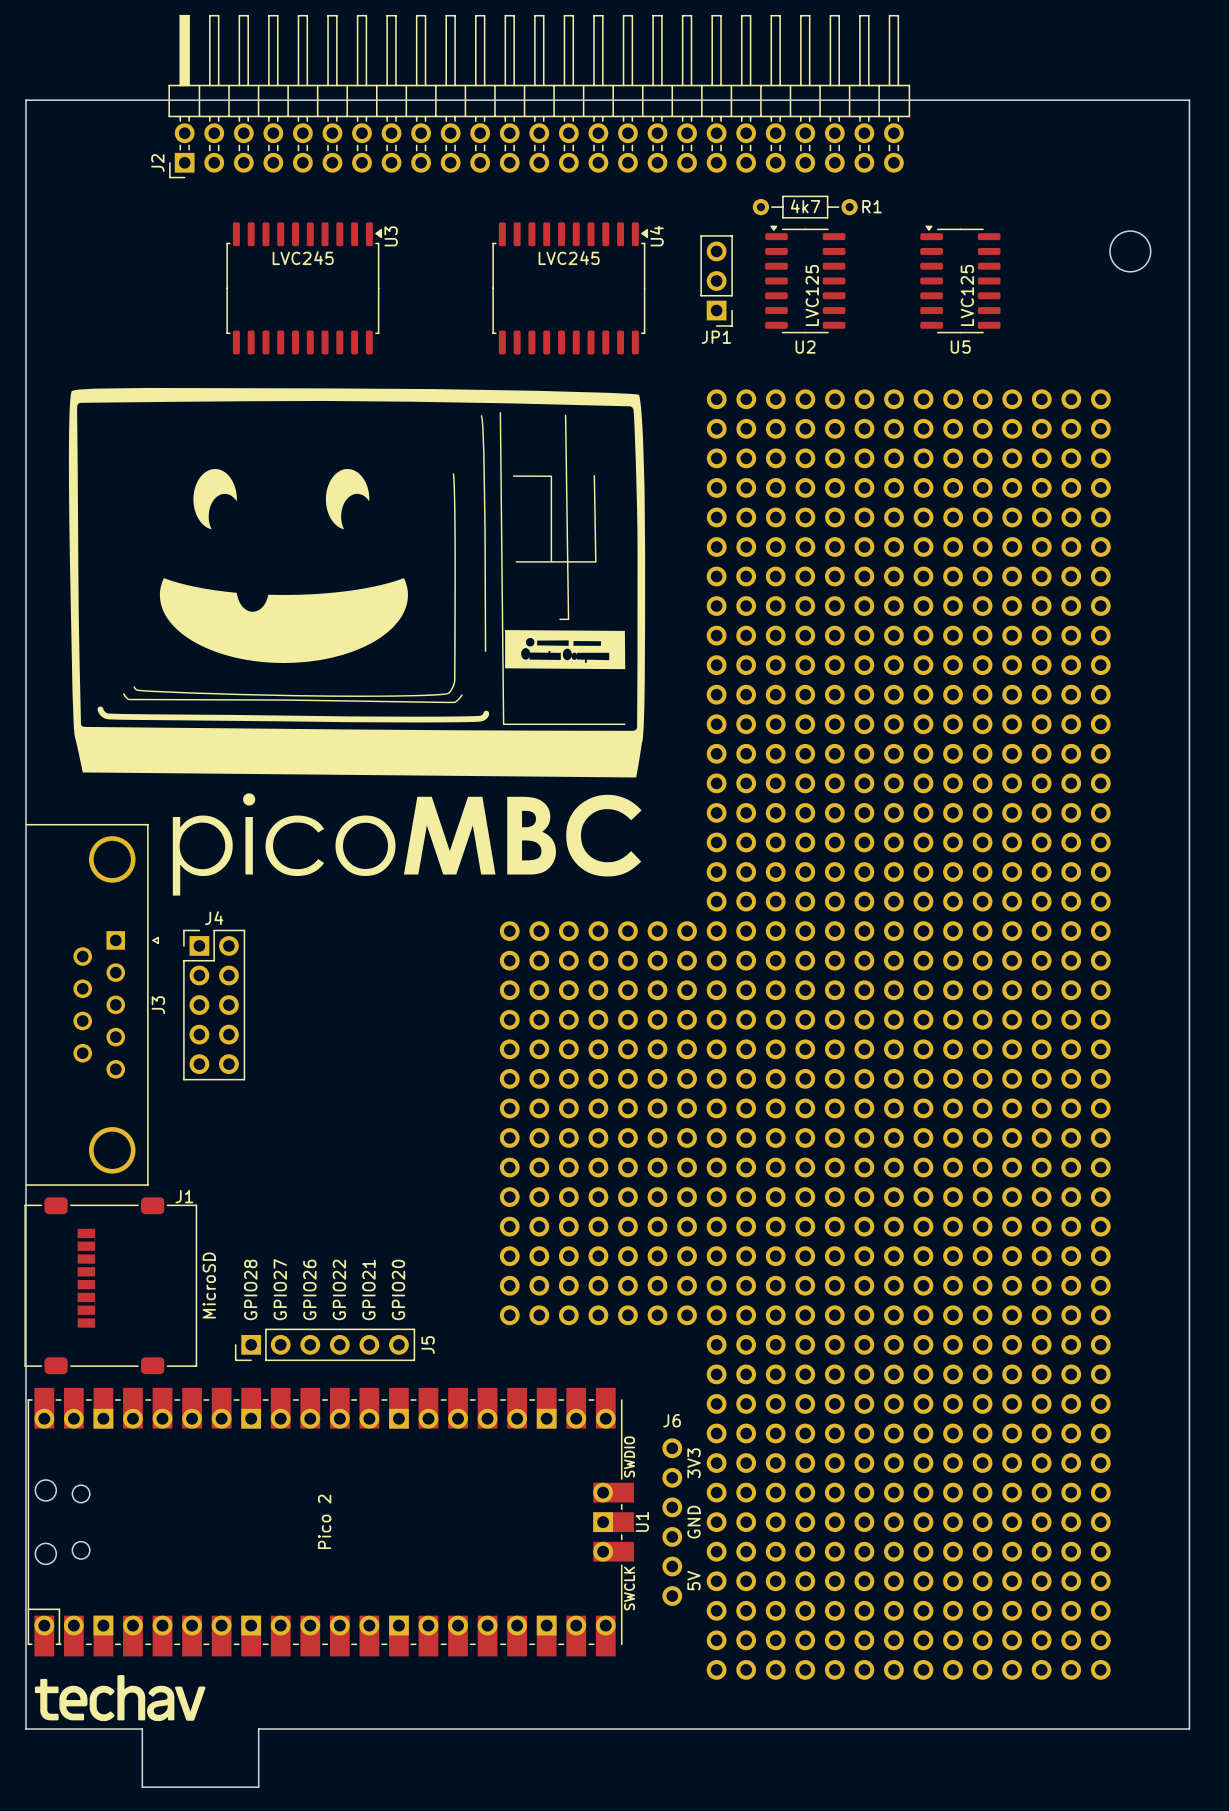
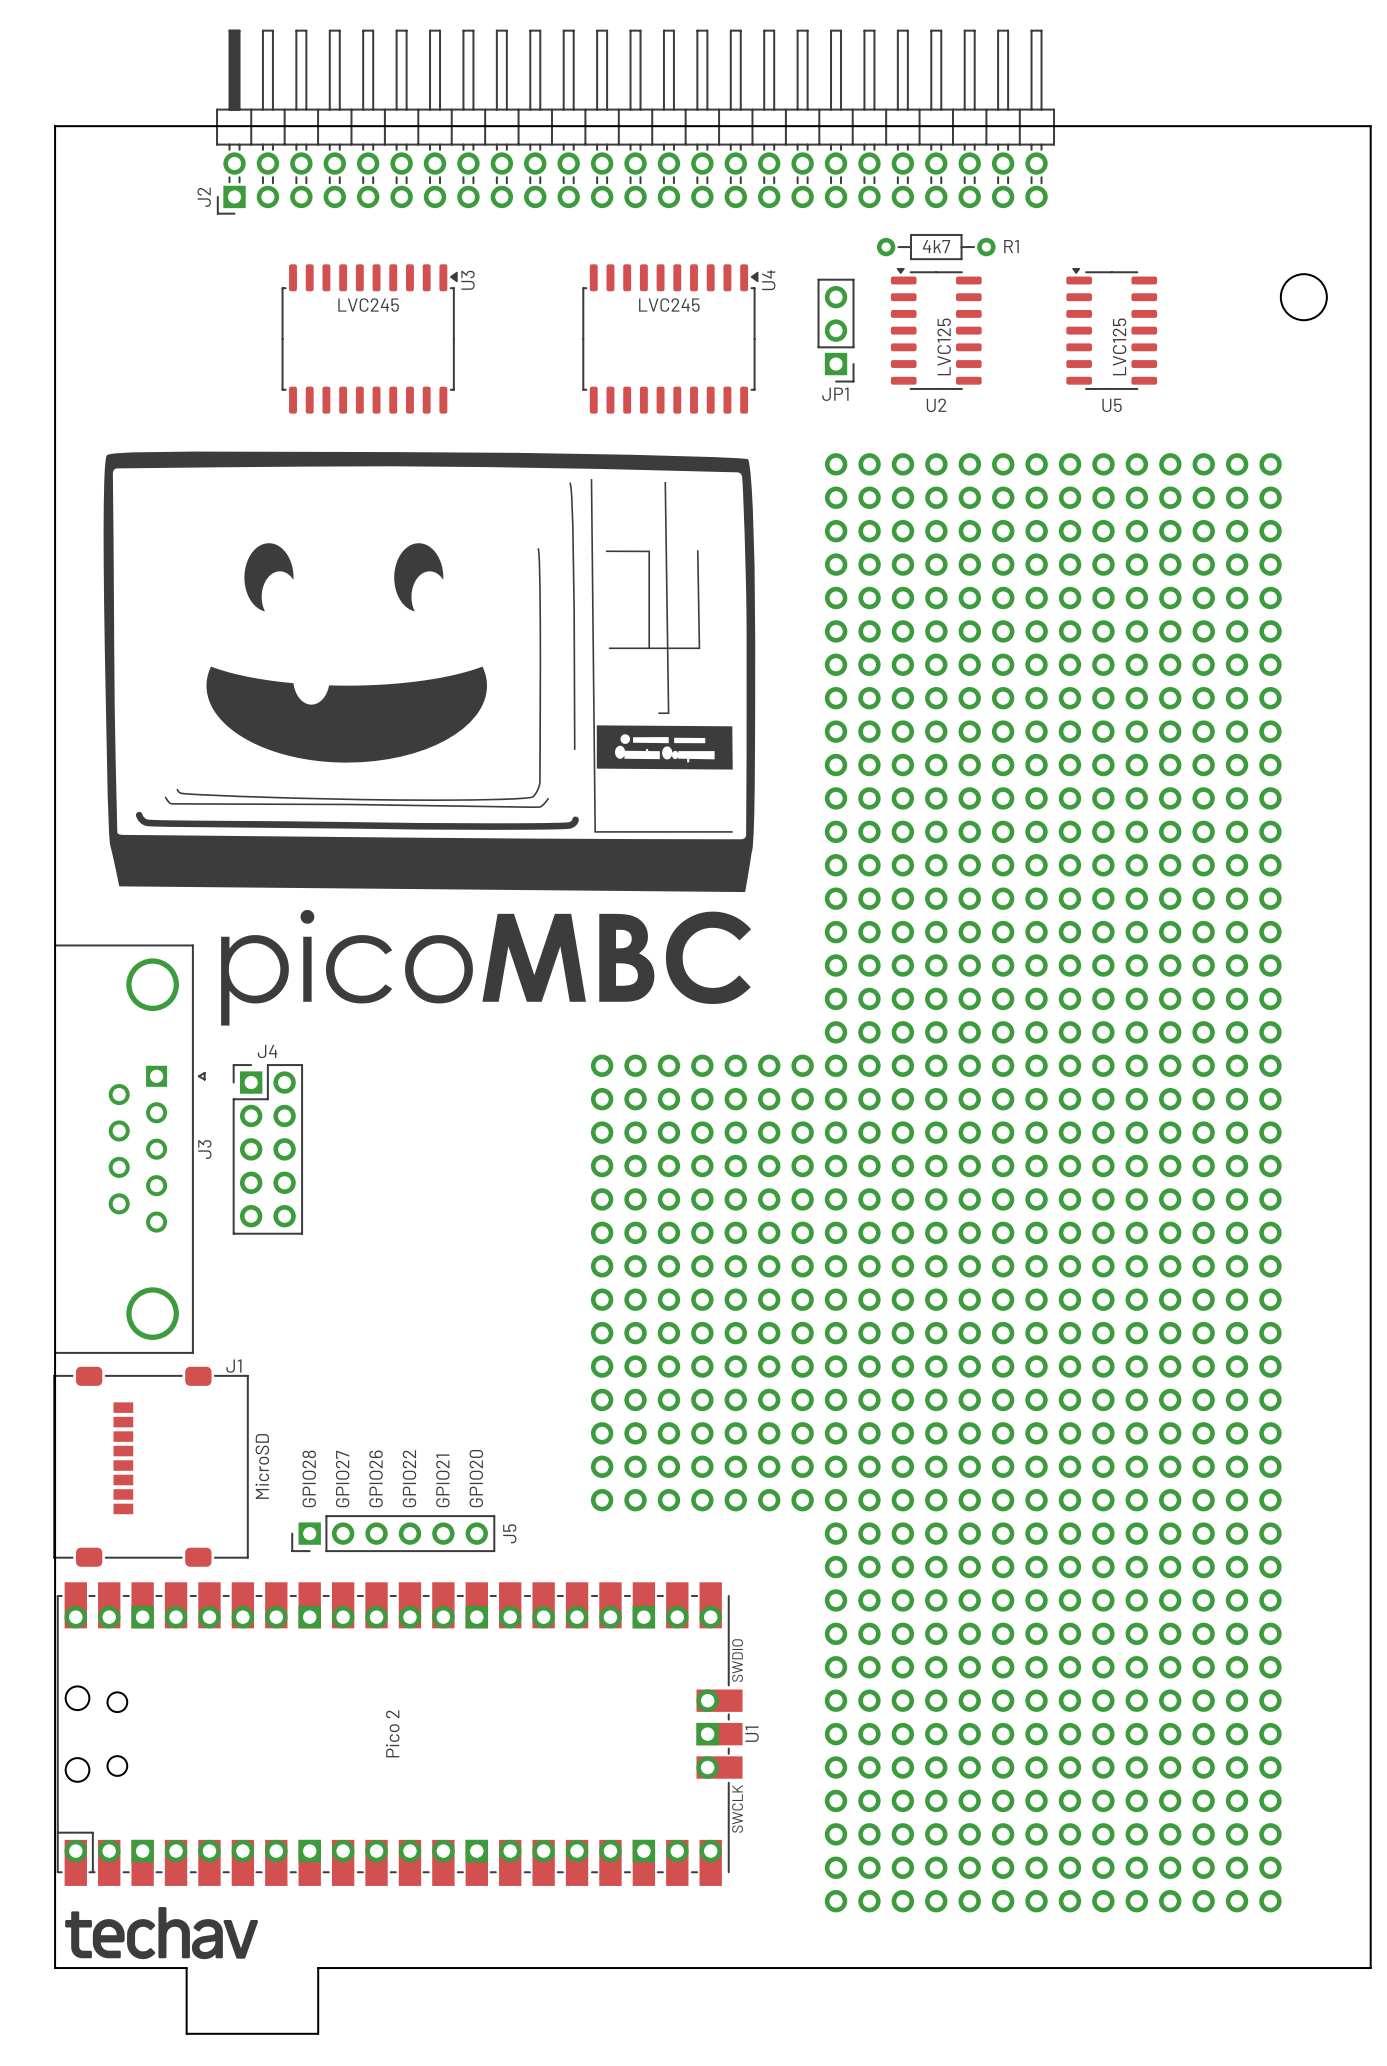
text: 3V3 (694, 1463) -> none
J6: (672, 1522) -> none
text: GND (694, 1522) -> none
text: 5V (694, 1580) -> none

